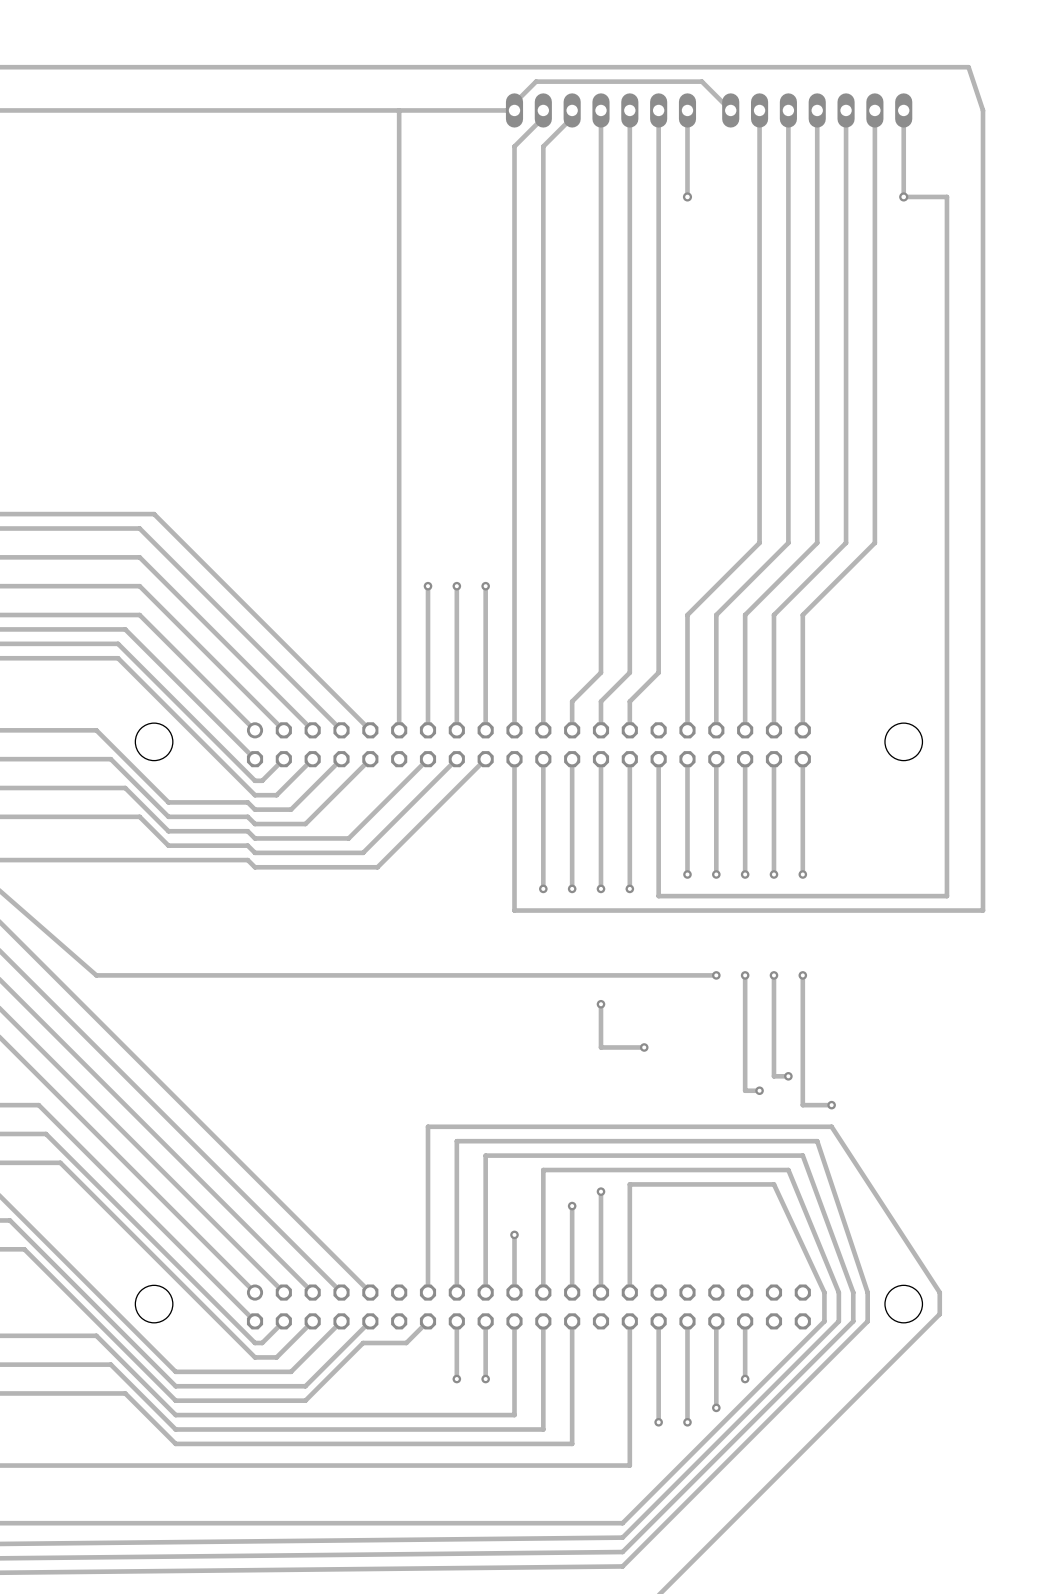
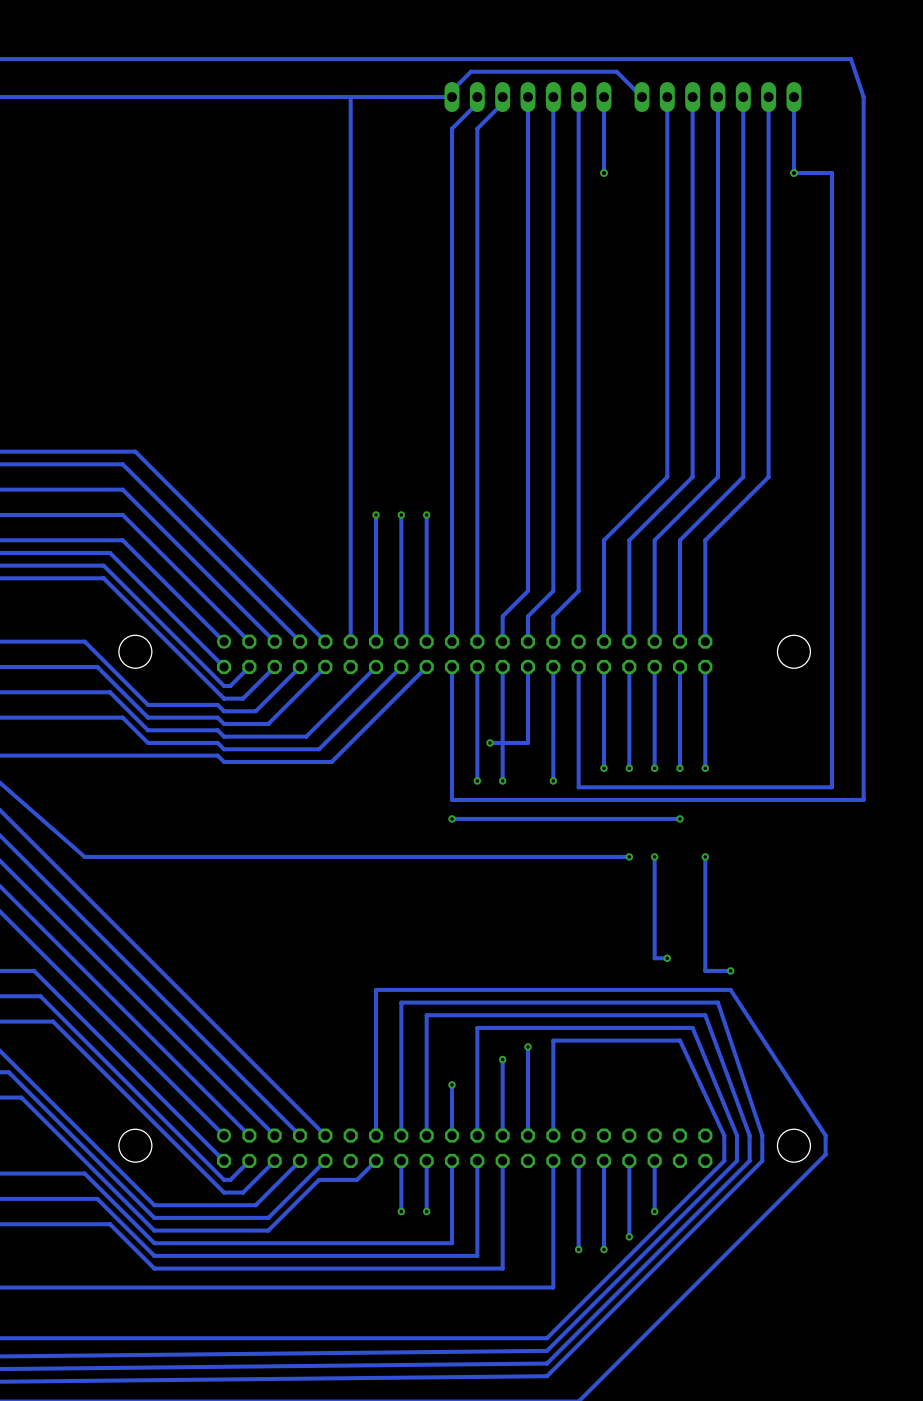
via: none -> (490, 742)
track: (600, 845) (600, 888) -> (528, 742) (490, 742)
via: (600, 888) -> none
via: none -> (452, 818)
track: none -> (679, 818) (452, 818)
track: (773, 975) (773, 1076) (788, 1076) -> none
via position: (773, 975) -> (679, 818)
track: (600, 1004) (600, 1047) (644, 1047) -> none
via: (600, 1004) -> none
via: (644, 1047) -> none
via: (788, 1076) -> none

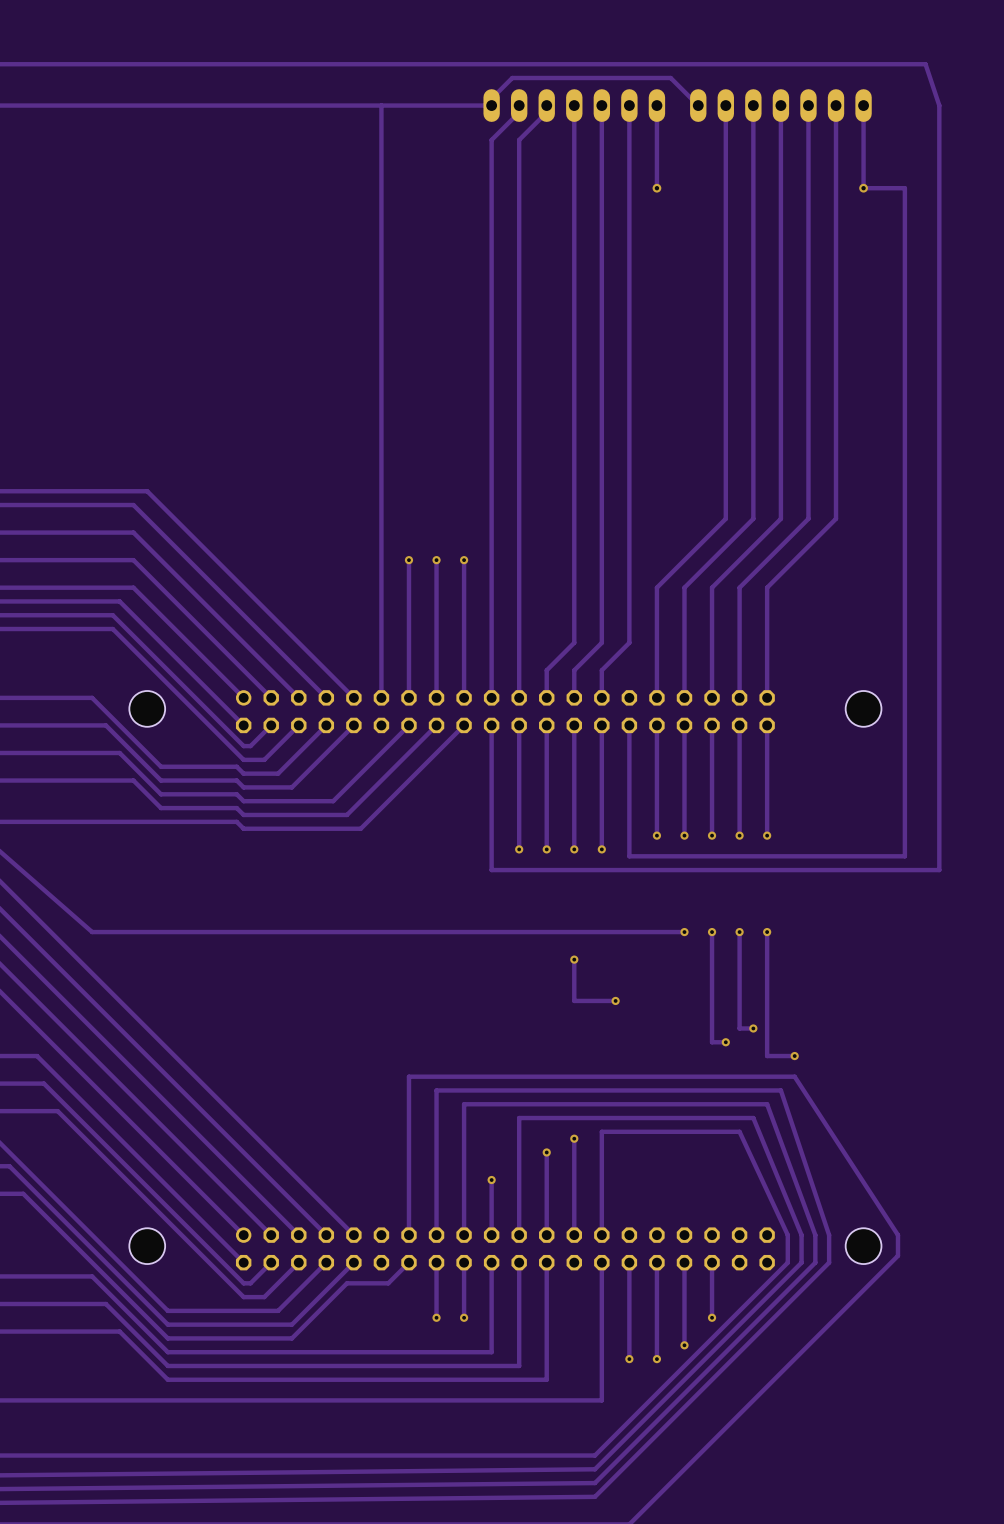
via: (490, 742) -> none
track: (528, 742) (490, 742) -> (574, 808) (574, 849)
via: none -> (574, 849)
via: (452, 818) -> none
track: (679, 818) (452, 818) -> none
via position: (679, 818) -> (739, 932)
track: none -> (739, 932) (739, 1028) (753, 1028)
track: none -> (574, 959) (574, 1000) (615, 1000)
via: none -> (574, 959)
via: none -> (615, 1000)
via: none -> (753, 1028)

